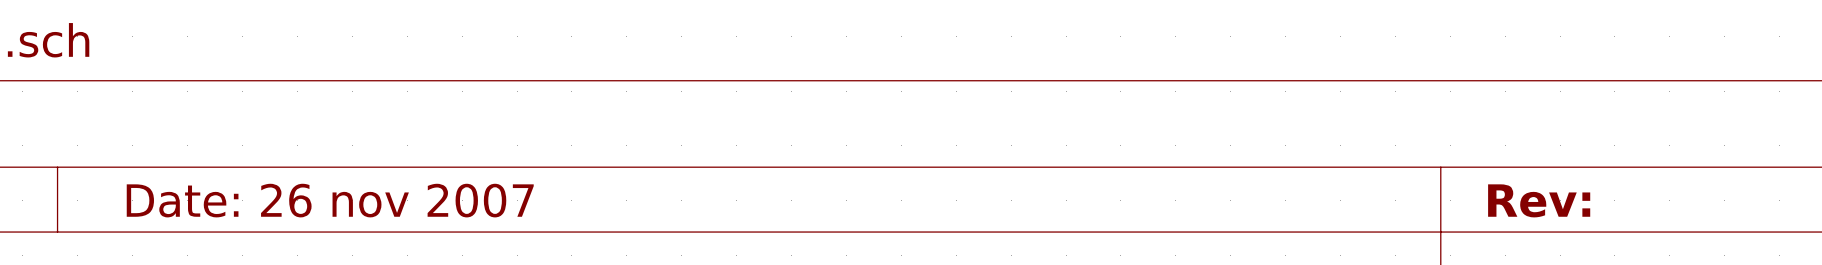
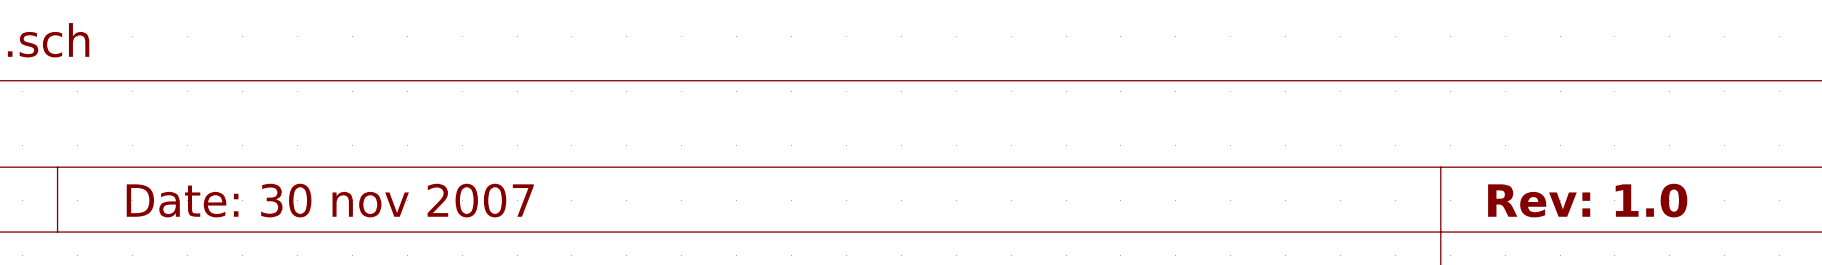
title block: Date: 26 nov 2007 (330, 200) -> Date: 30 nov 2007 (330, 200)
title block: Rev: (1539, 200) -> Rev: 1.0 (1587, 200)

